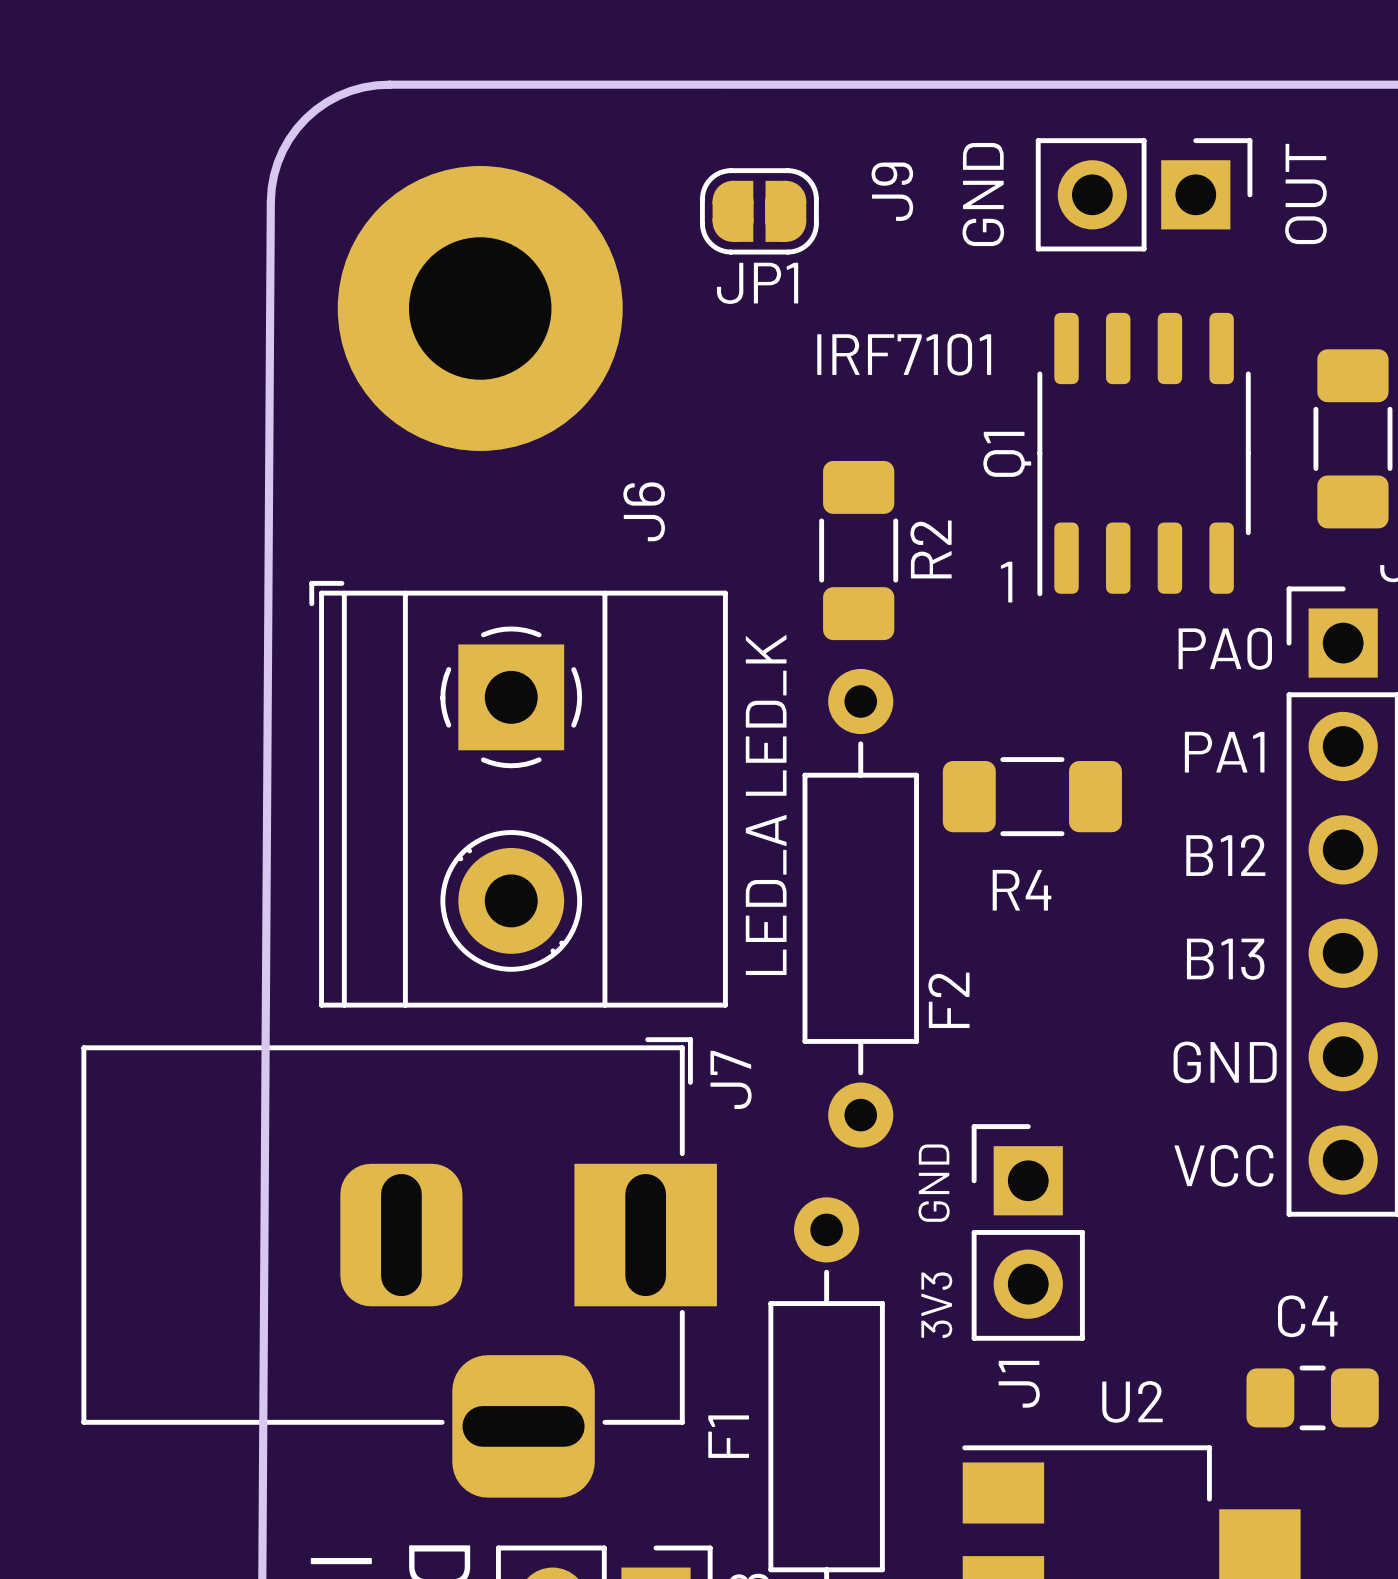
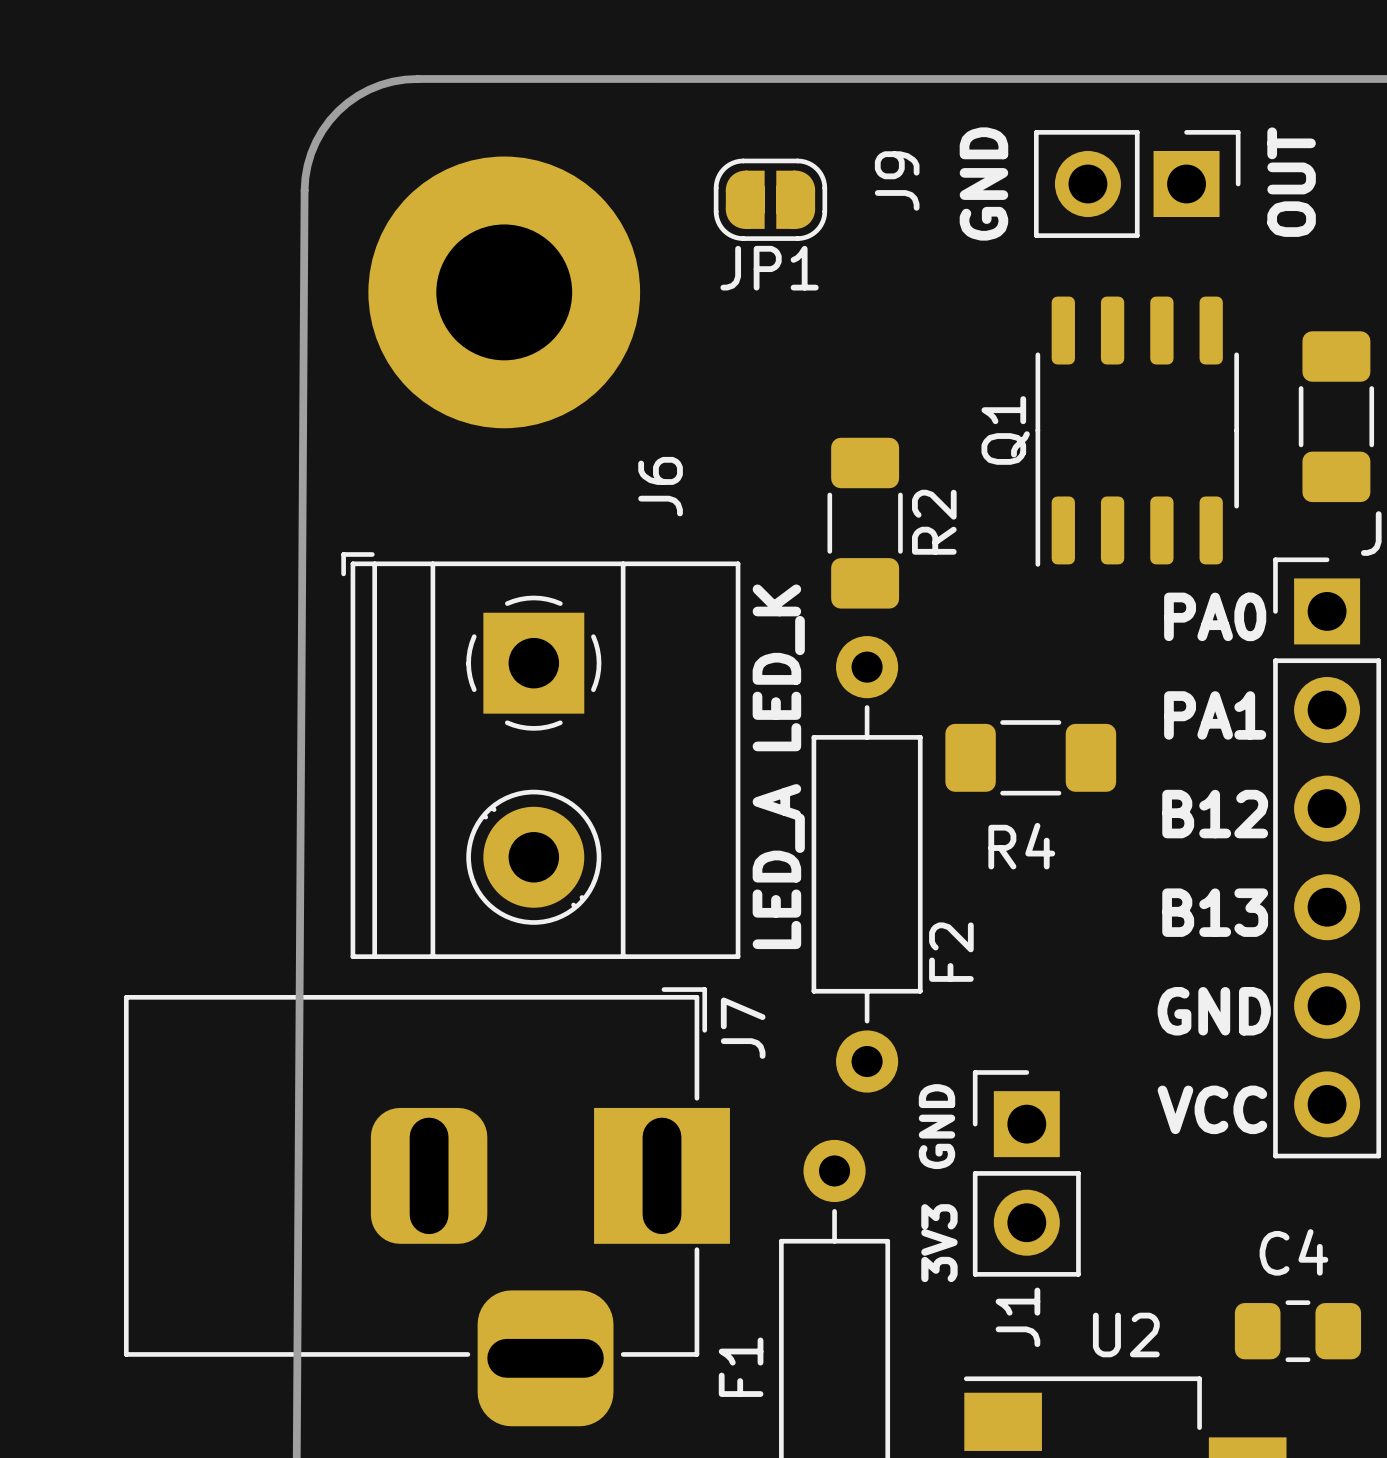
text: IRF7101 (904, 354) -> none
text: 1 (1006, 582) -> none

